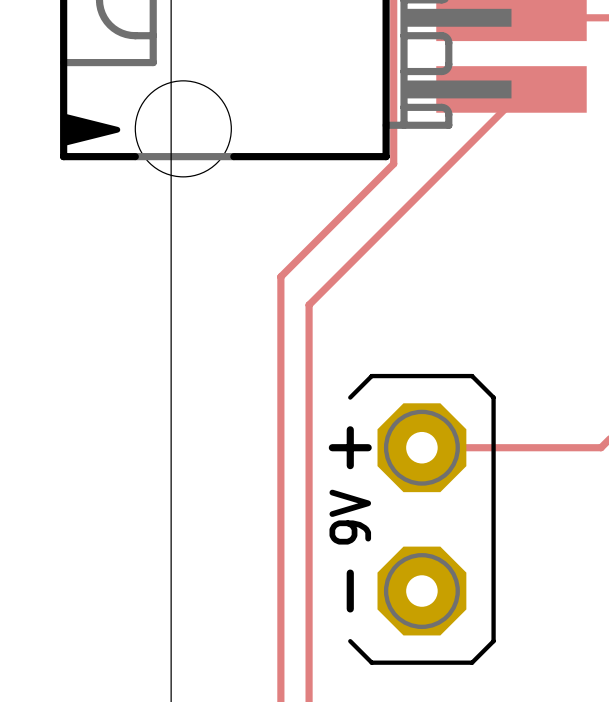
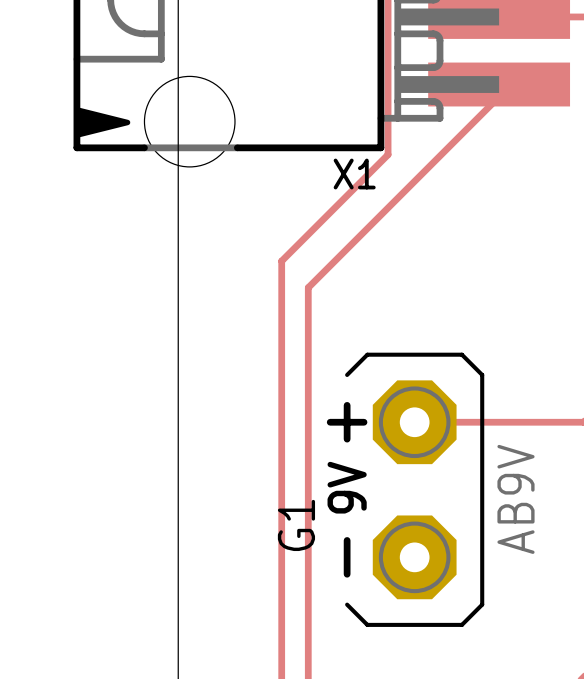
X1 name: none -> X1 (354, 174)
G1 value: none -> AB9V (515, 499)
G1 name: none -> G1 (296, 525)

